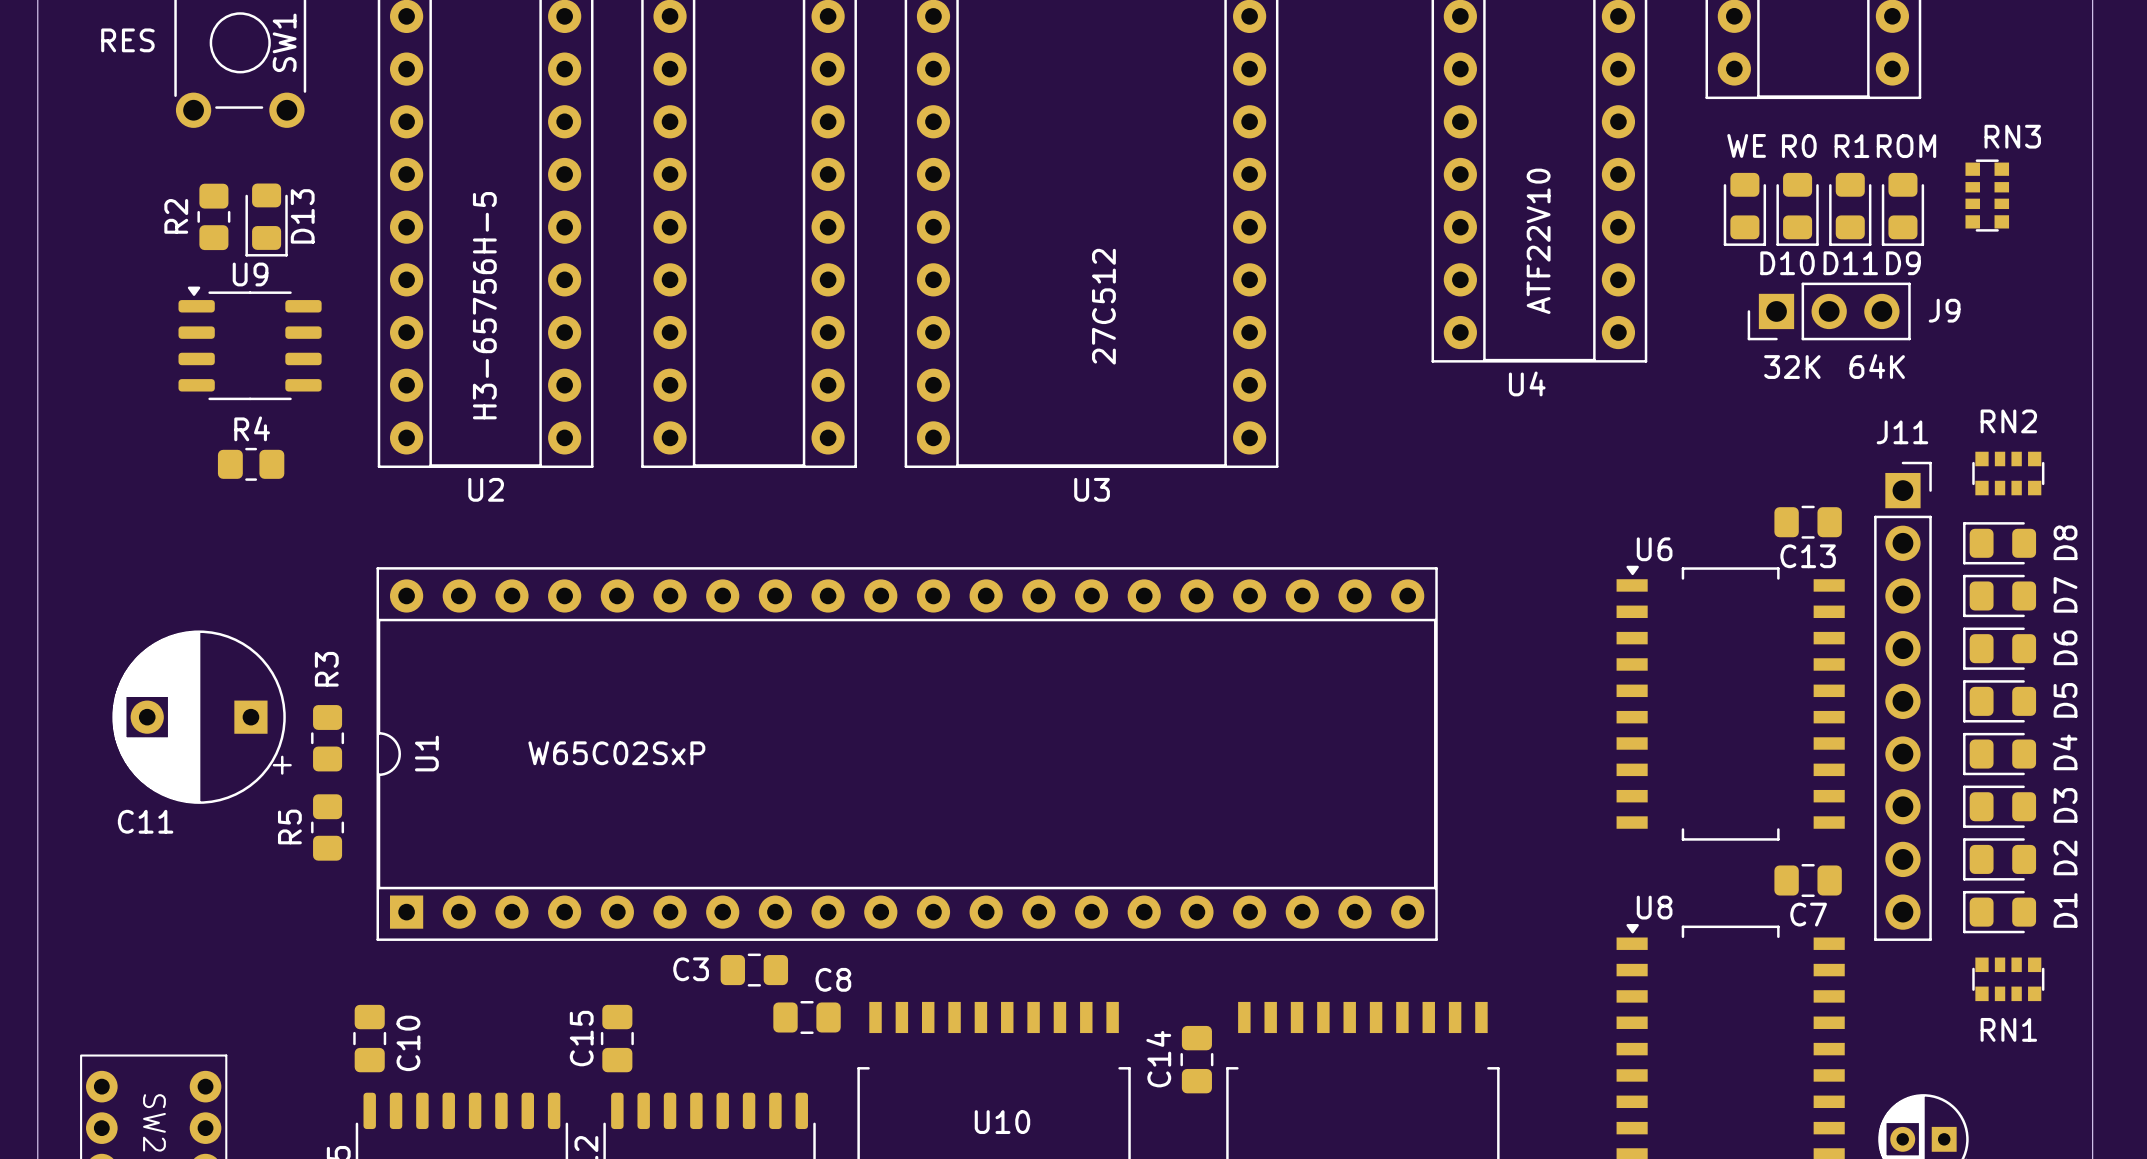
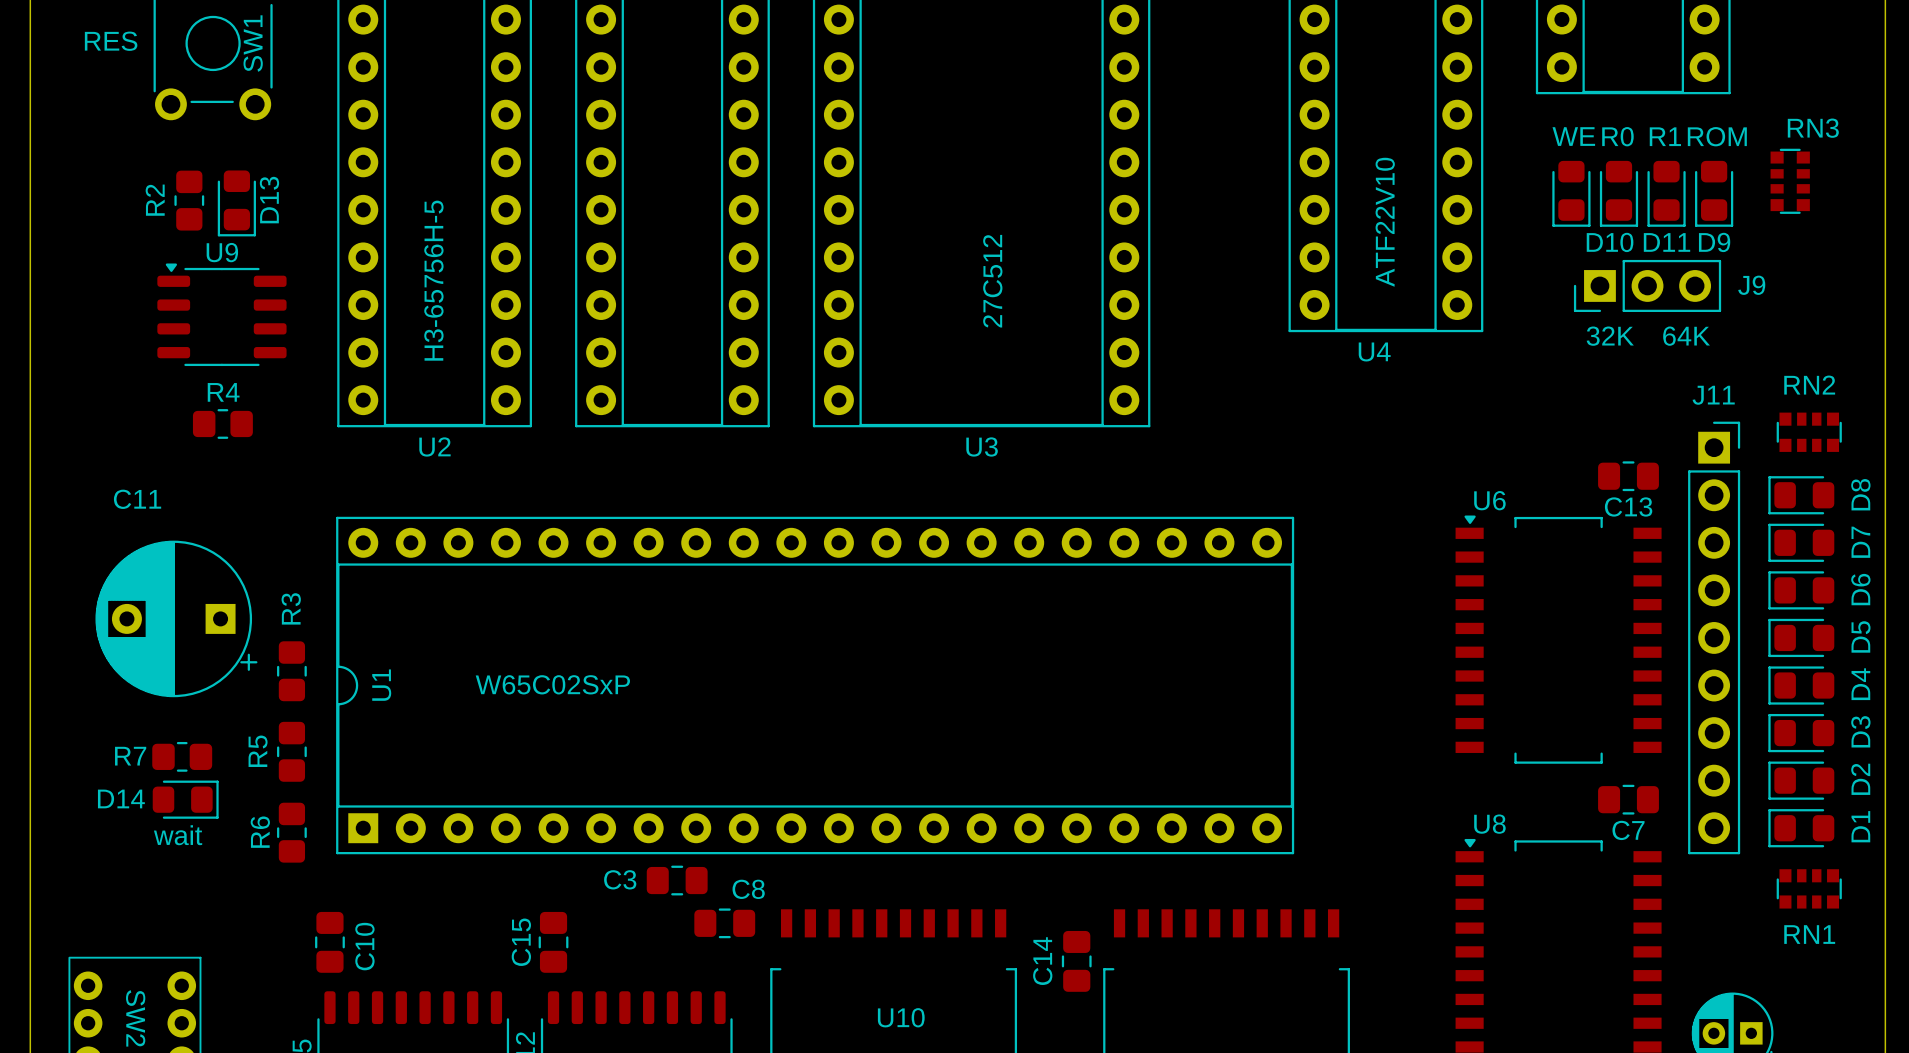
C11 position: (202, 717) -> (176, 618)
C11 name position: C11 (145, 821) -> C11 (137, 499)
R7: none -> (182, 756)
D14: none -> (185, 799)
R6: none -> (291, 832)
text: none -> wait (178, 835)

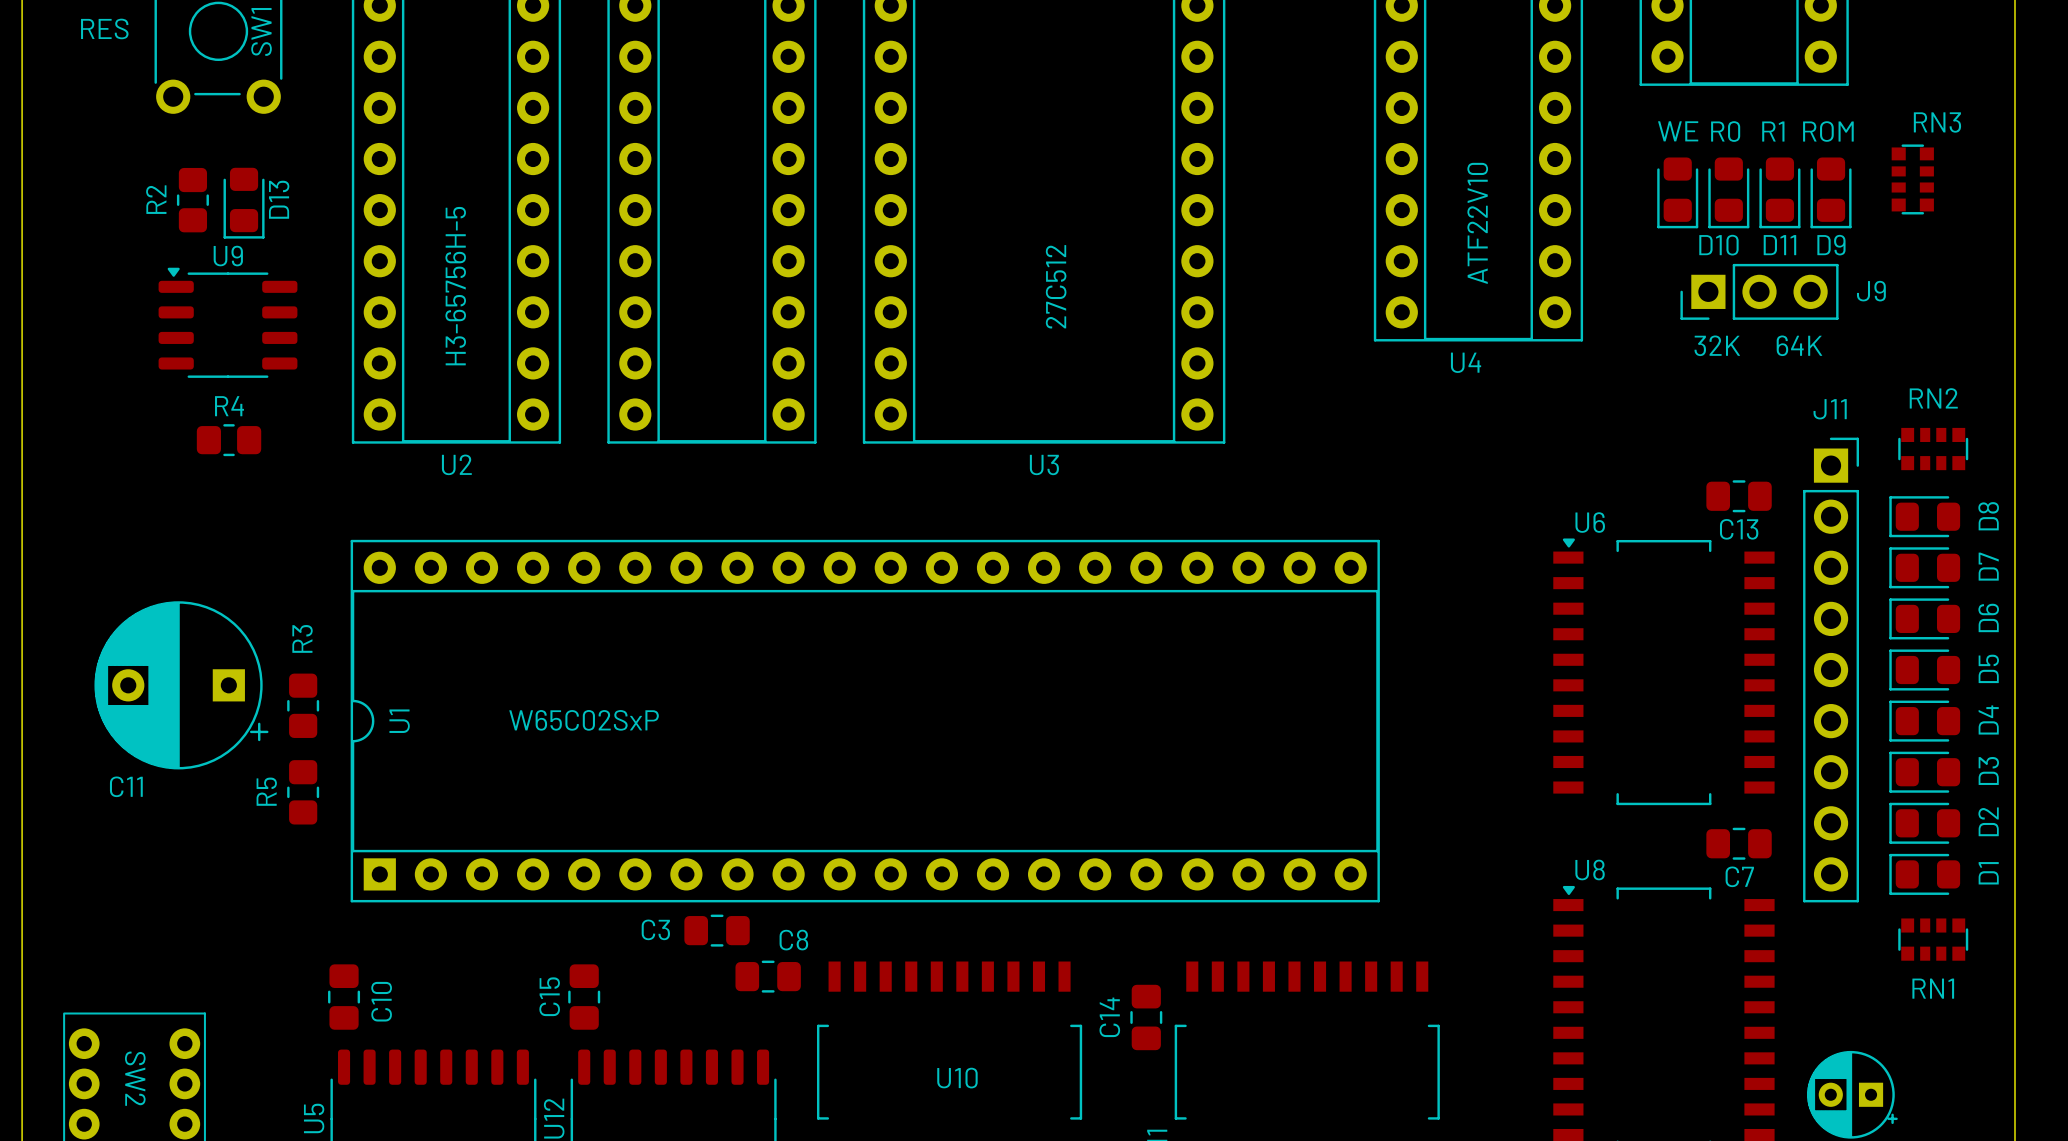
C11 name position: C11 (137, 499) -> C11 (126, 786)
C11 position: (176, 618) -> (181, 685)
R7: (182, 756) -> none
D14: (185, 799) -> none
R6: (291, 832) -> none
text: wait (178, 835) -> none

